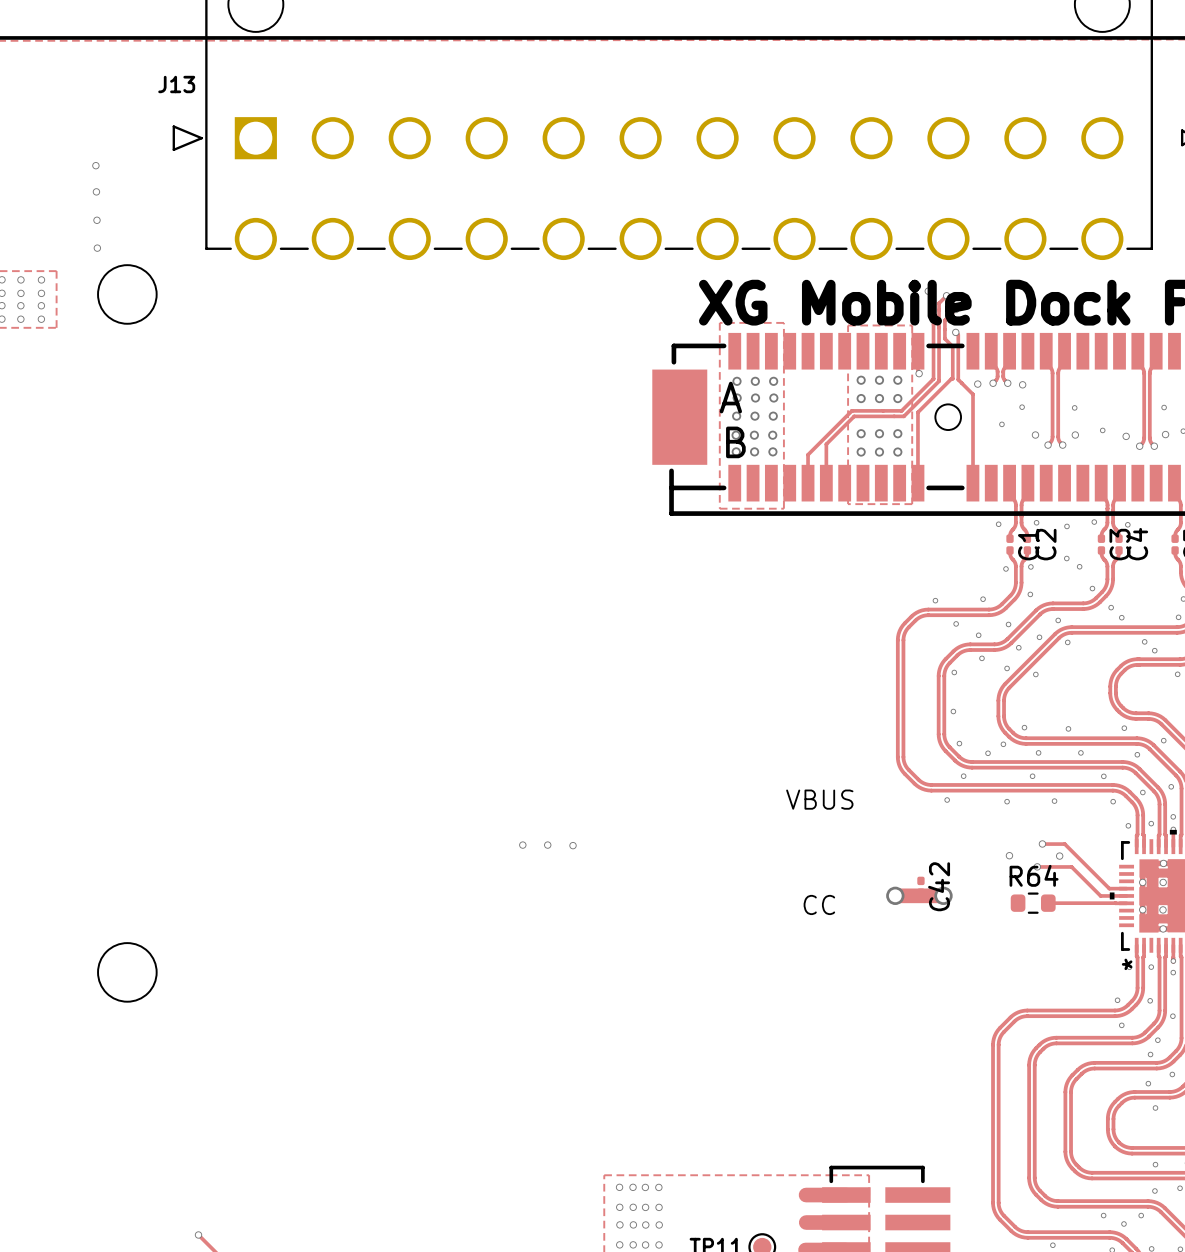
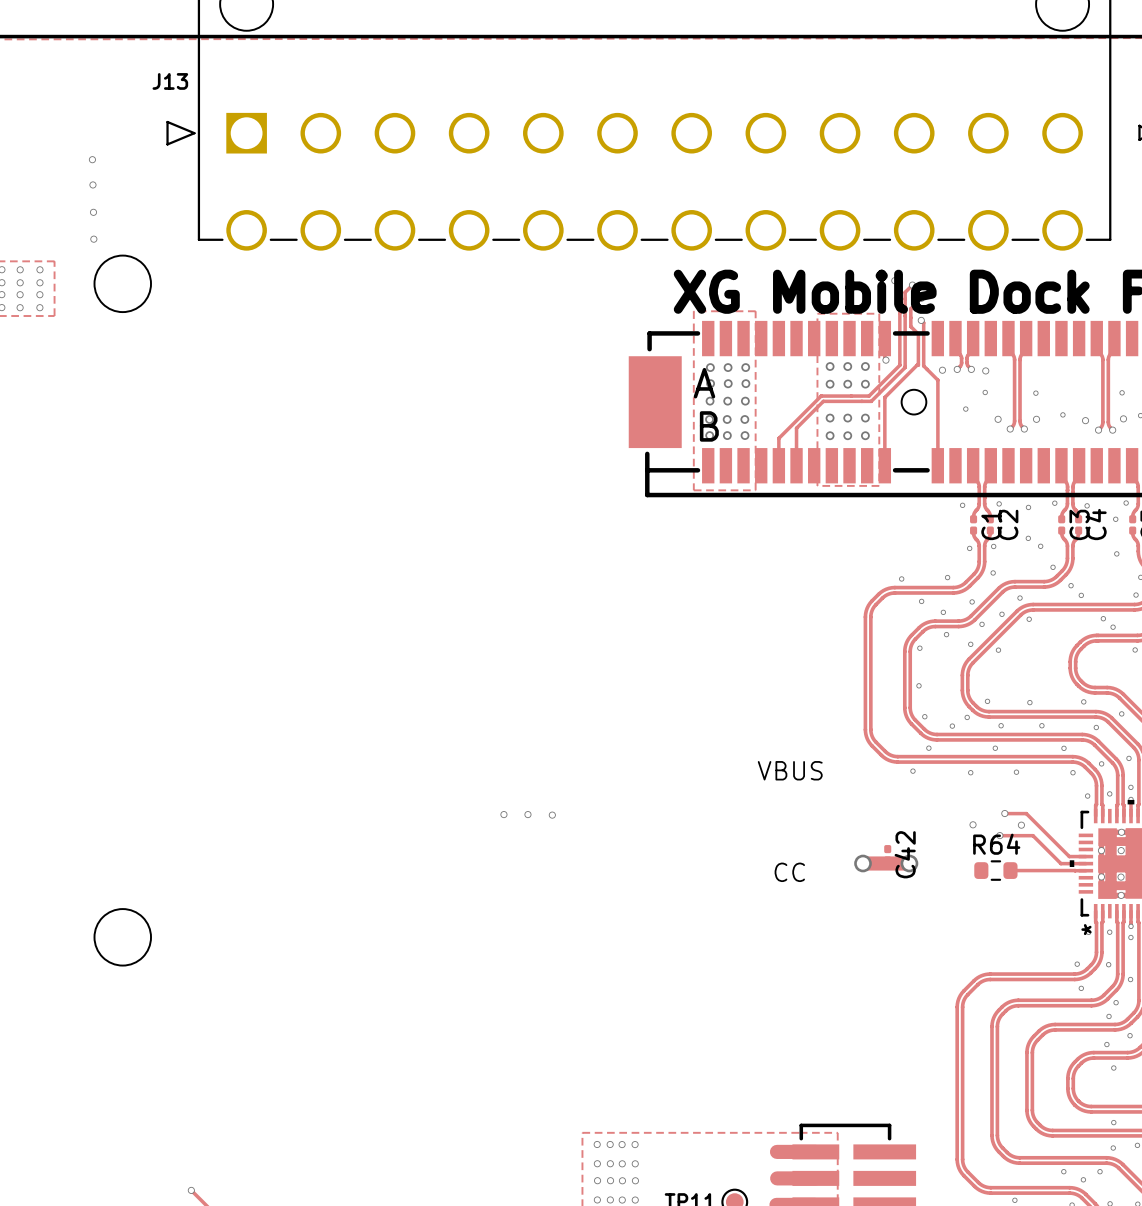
via: none -> (1126, 503)
via: none -> (1115, 519)
via: none -> (1116, 553)

